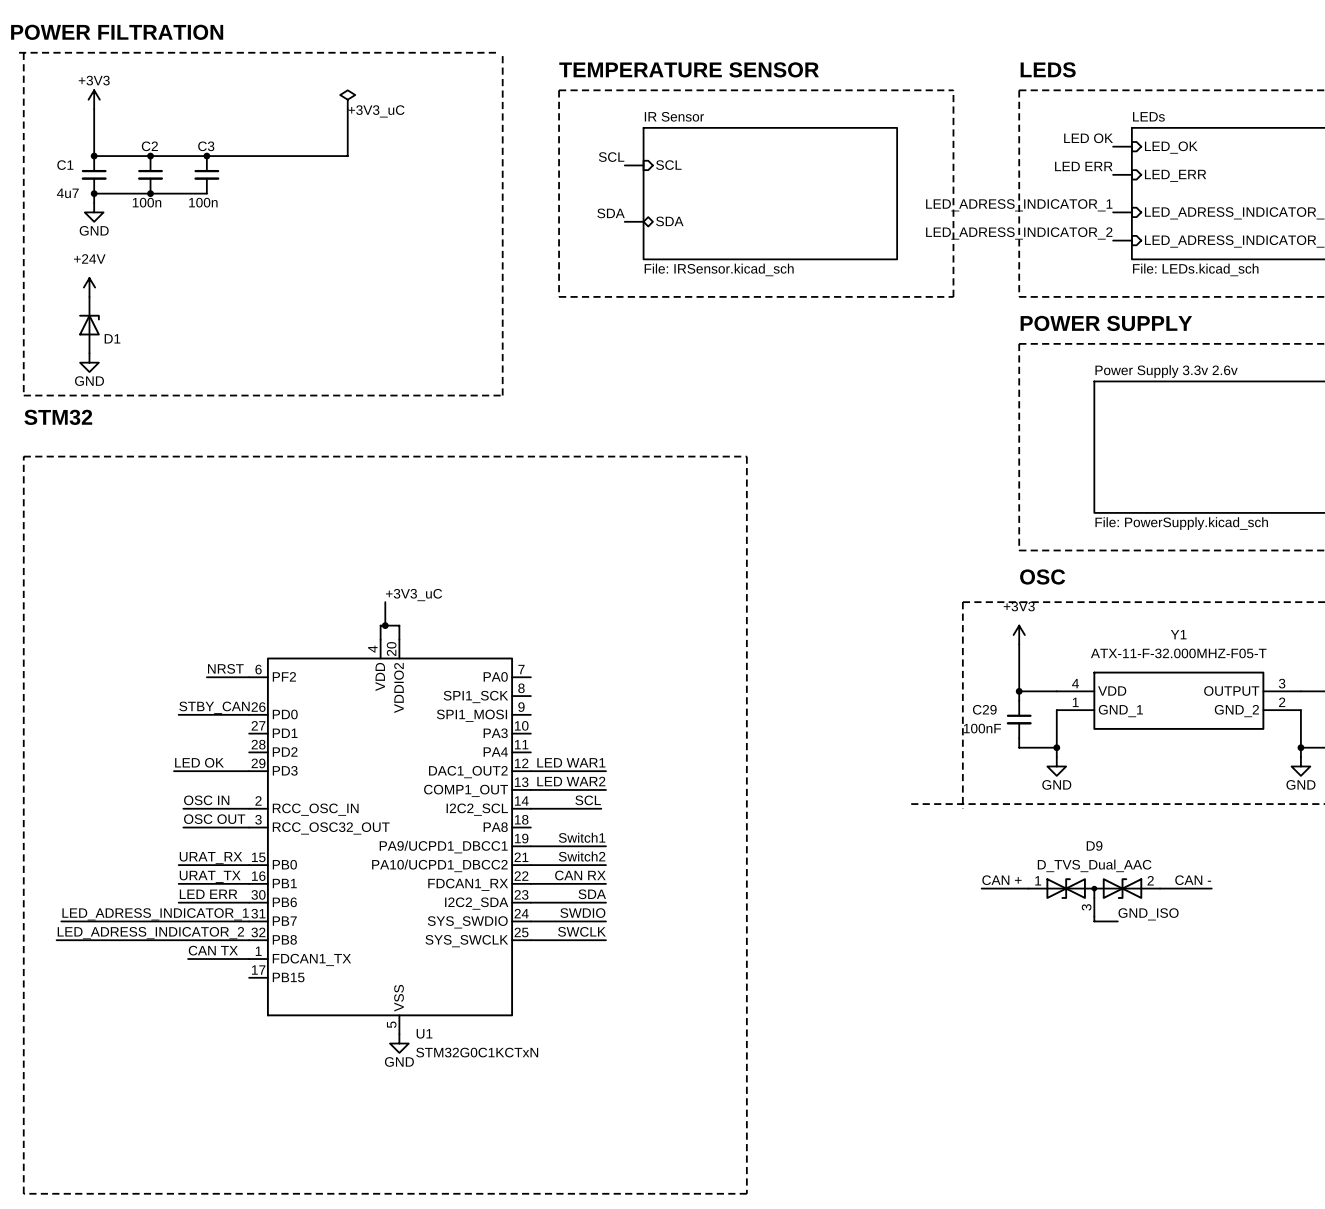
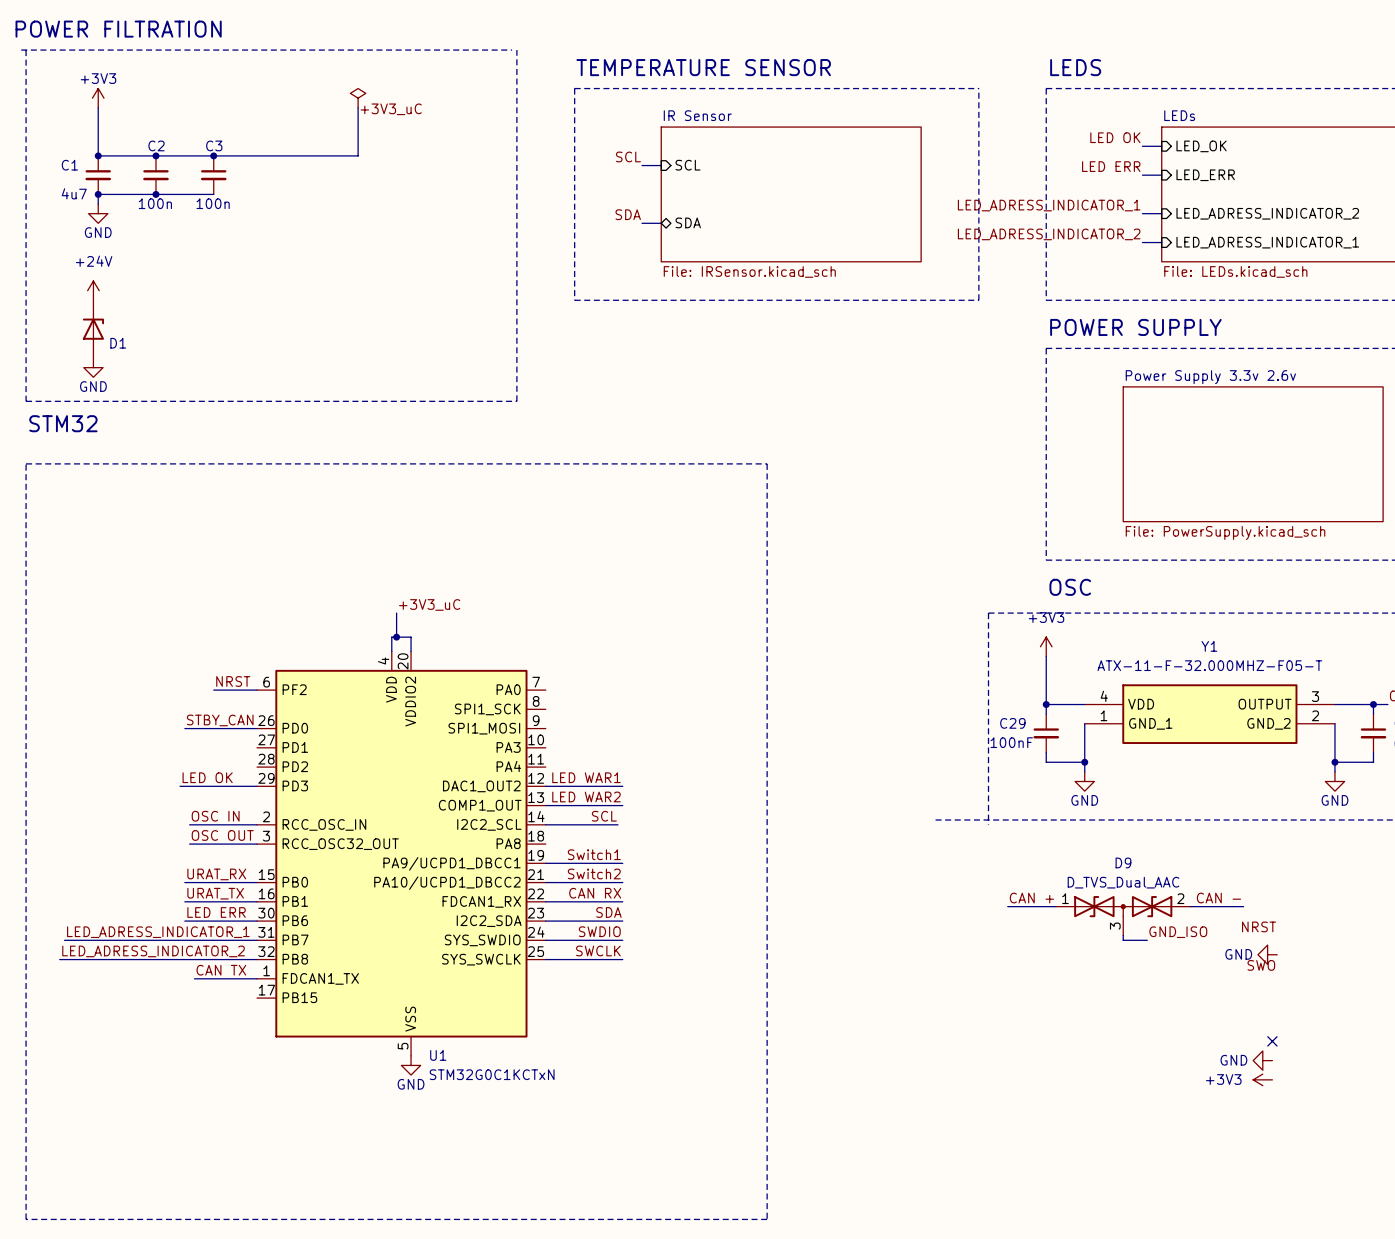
label: none -> NRST (1259, 926)
power symbol: none -> GND (1267, 954)
label: none -> SWO (1261, 965)
no-connect mark: none -> (1272, 1041)
power symbol: none -> GND (1262, 1060)
power symbol: none -> +3V3 (1262, 1079)

